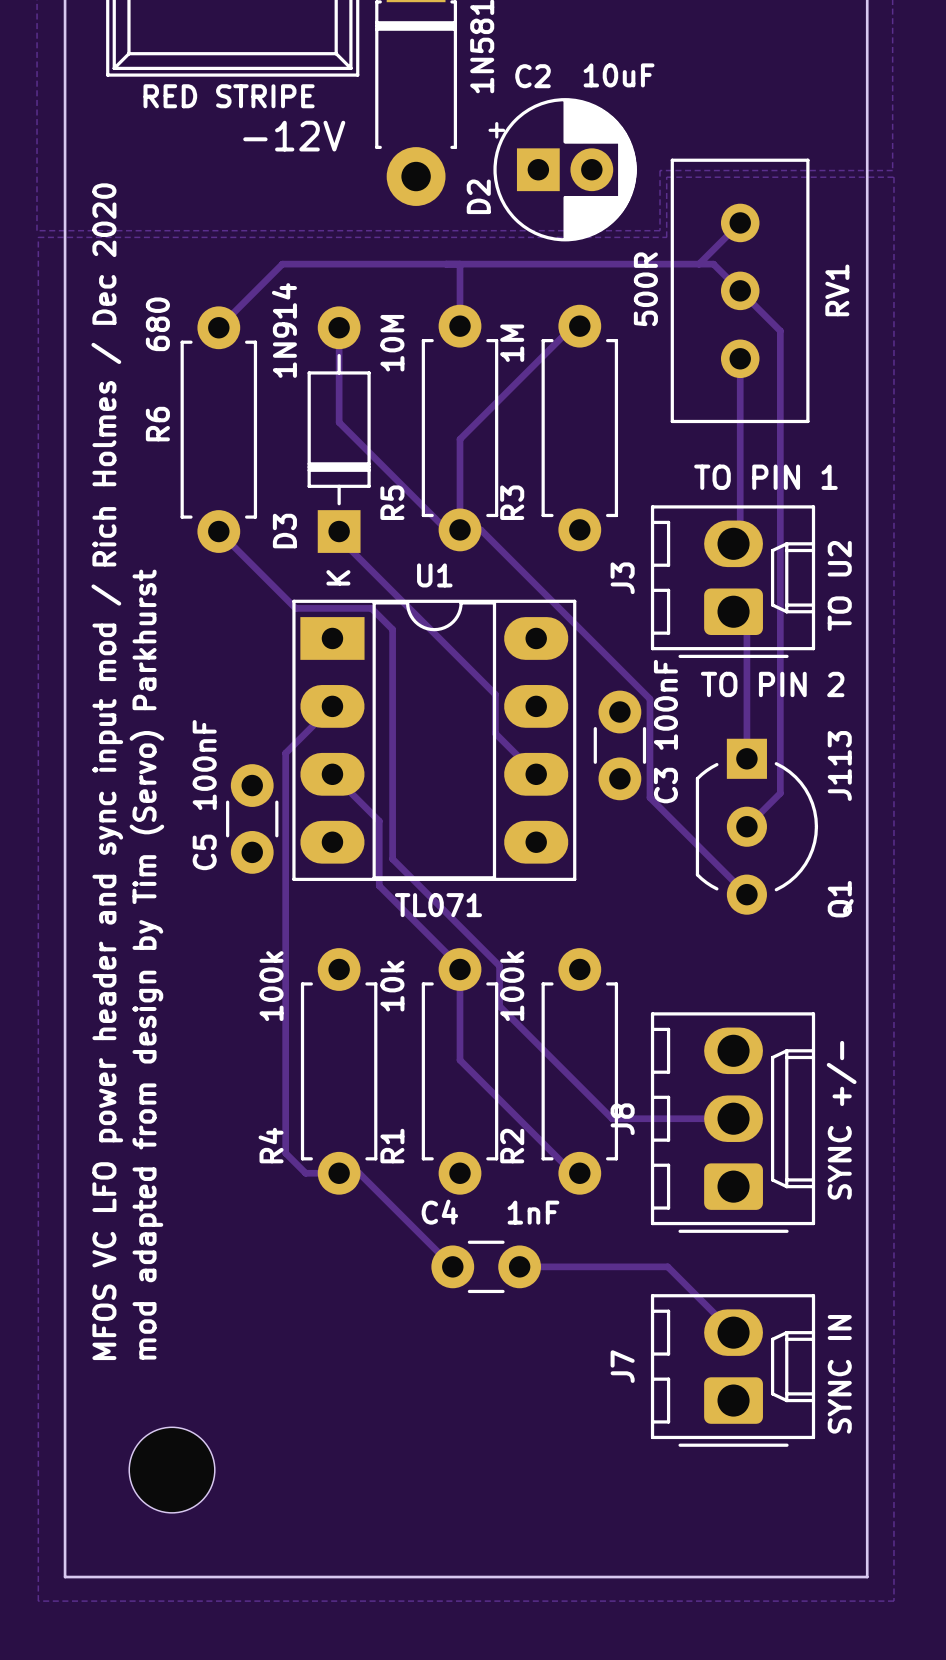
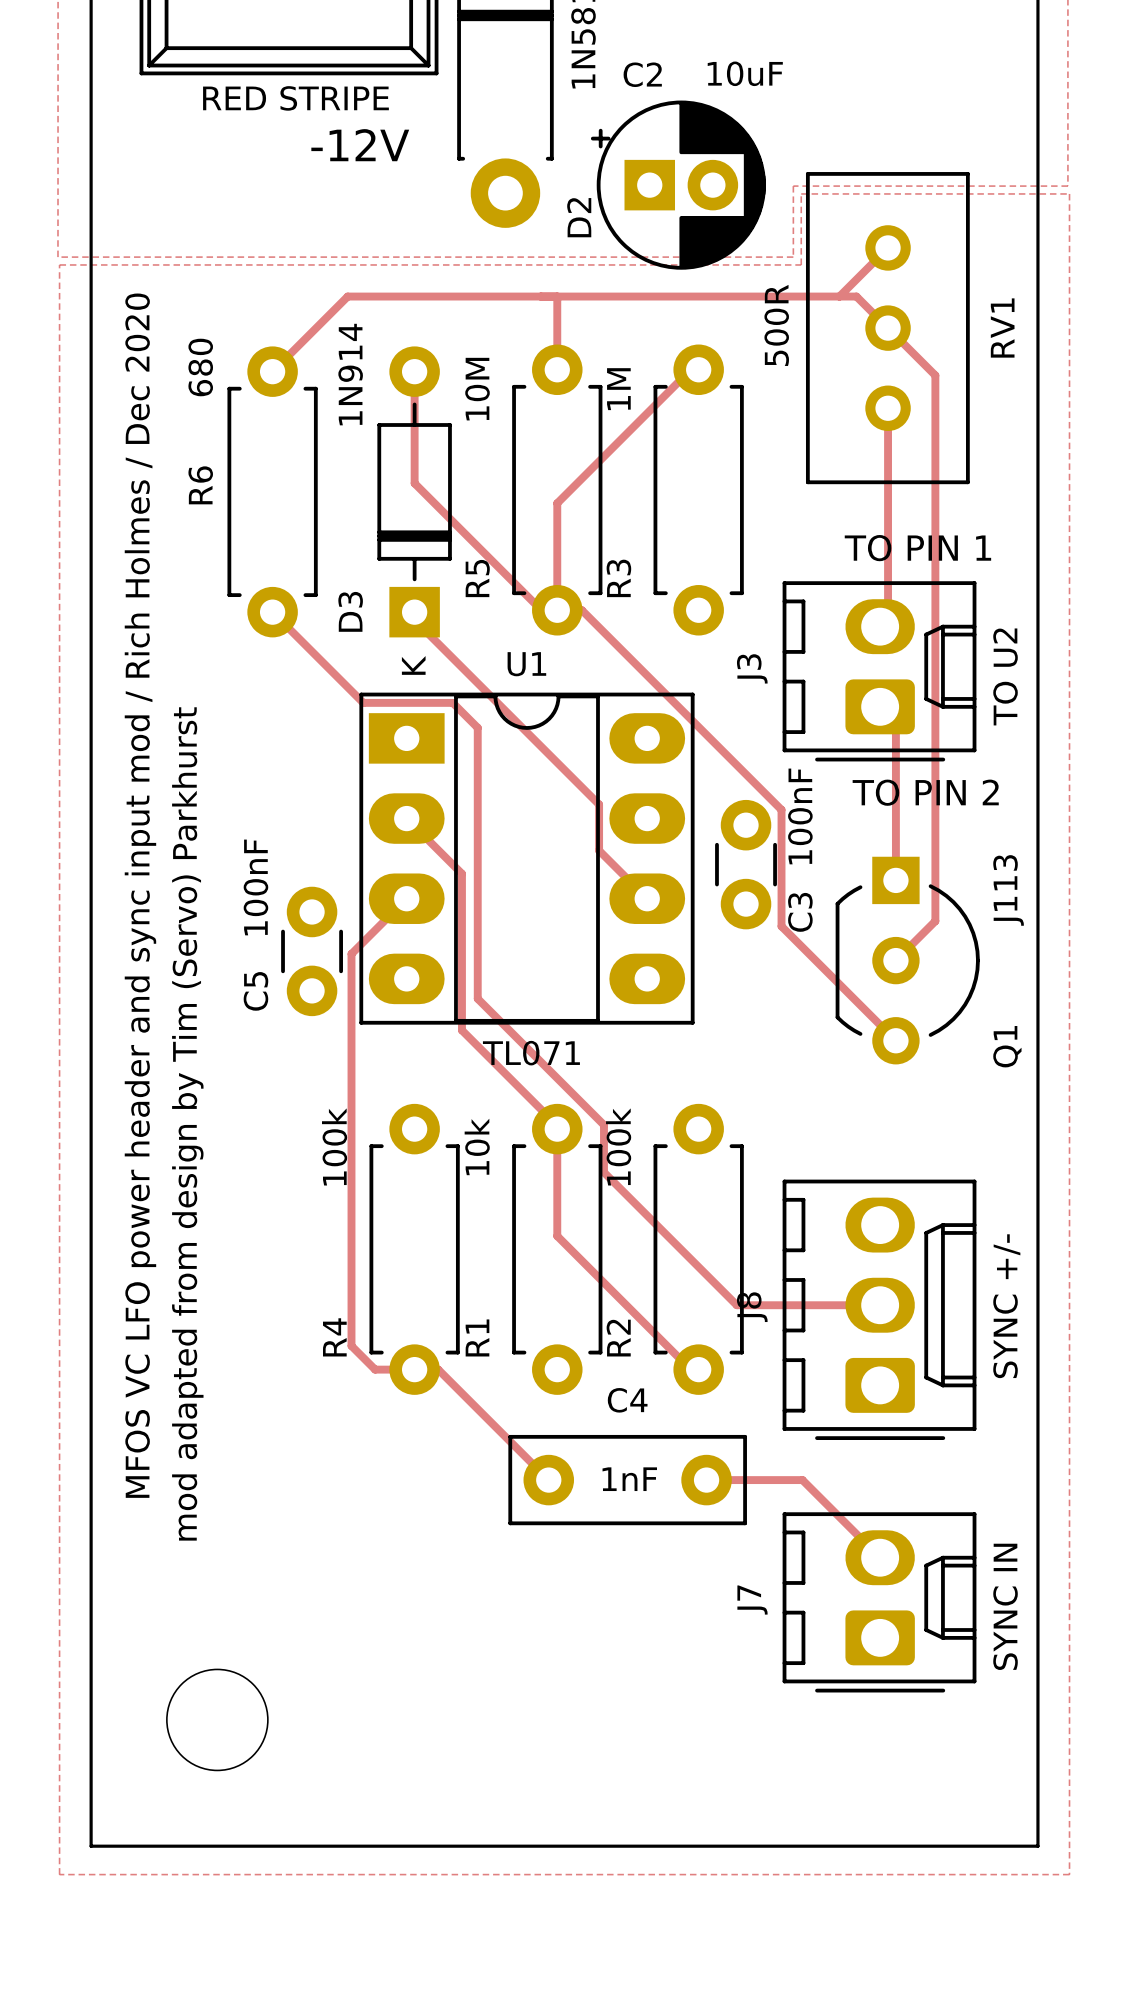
track: (332, 706) (285, 753) (285, 821) -> (406, 898) (351, 953)
track: (332, 774) (379, 821) -> (406, 818) (461, 873) (461, 953)
C4 value position: 1nF (533, 1212) -> 1nF (629, 1479)
C4 footprint: [431, 1240, 542, 1294] -> [508, 1434, 747, 1526]
track: (519, 1266) (586, 1266) -> none

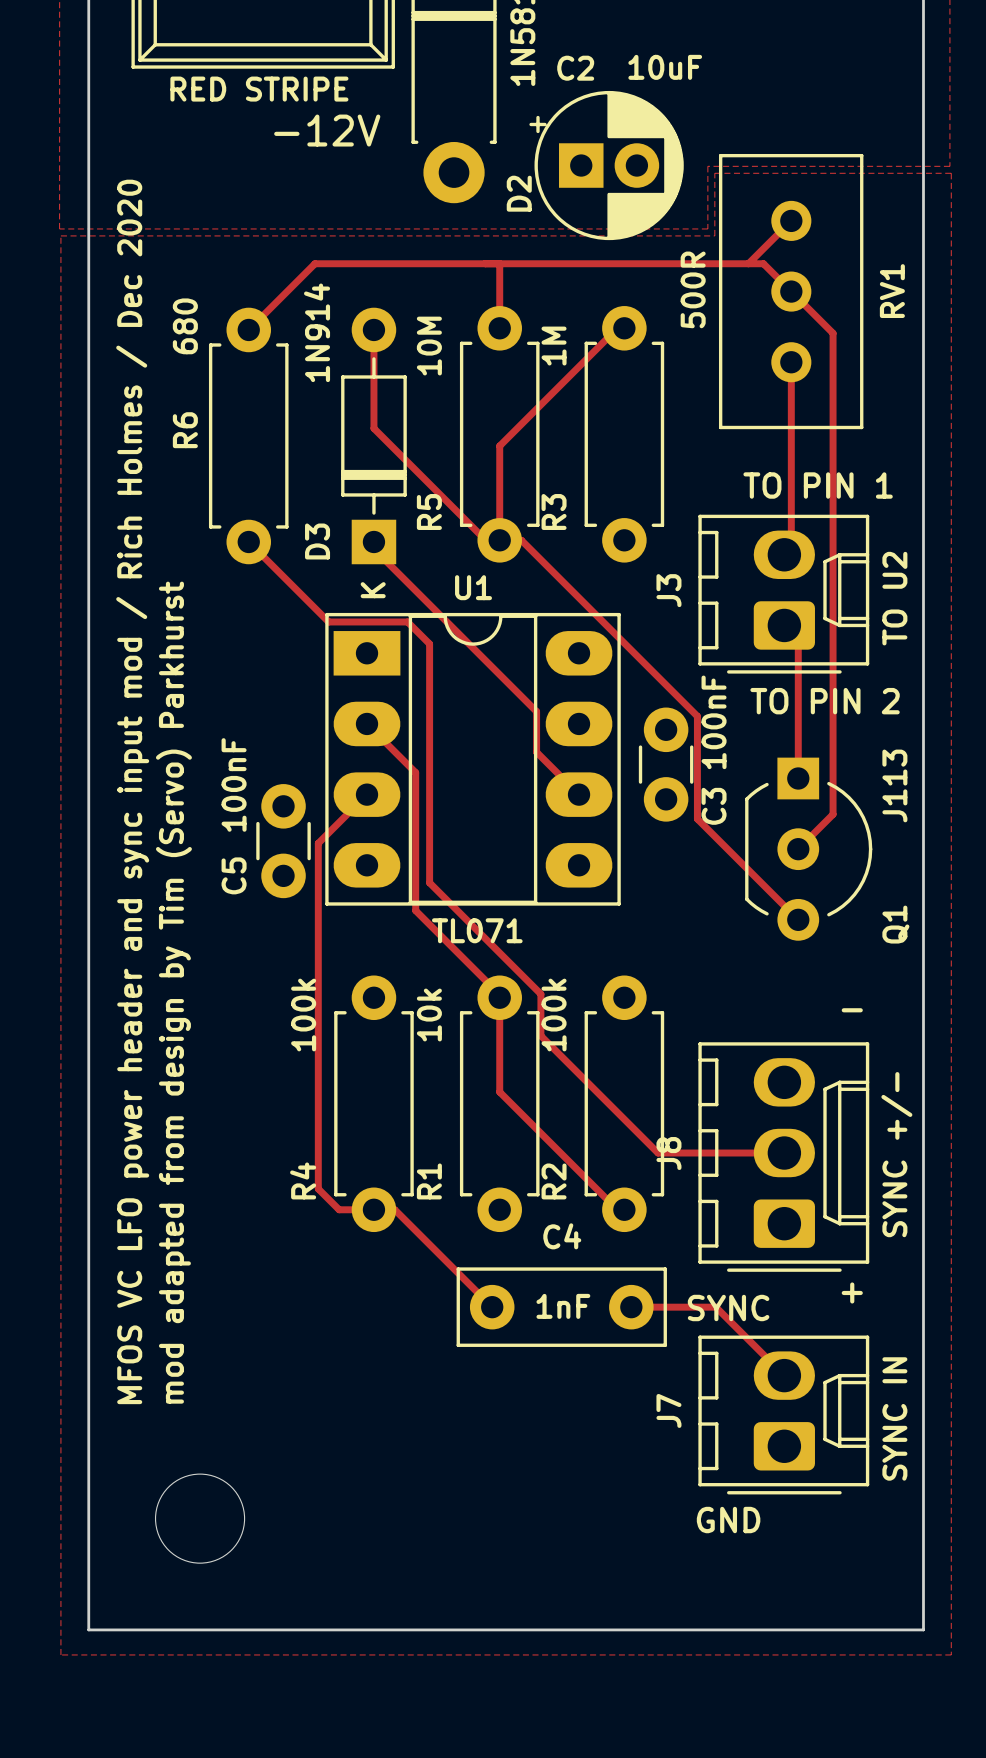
text: none -> - (852, 1010)
text: none -> + (852, 1292)
text: none -> SYNC (728, 1308)
text: none -> GND (728, 1520)

